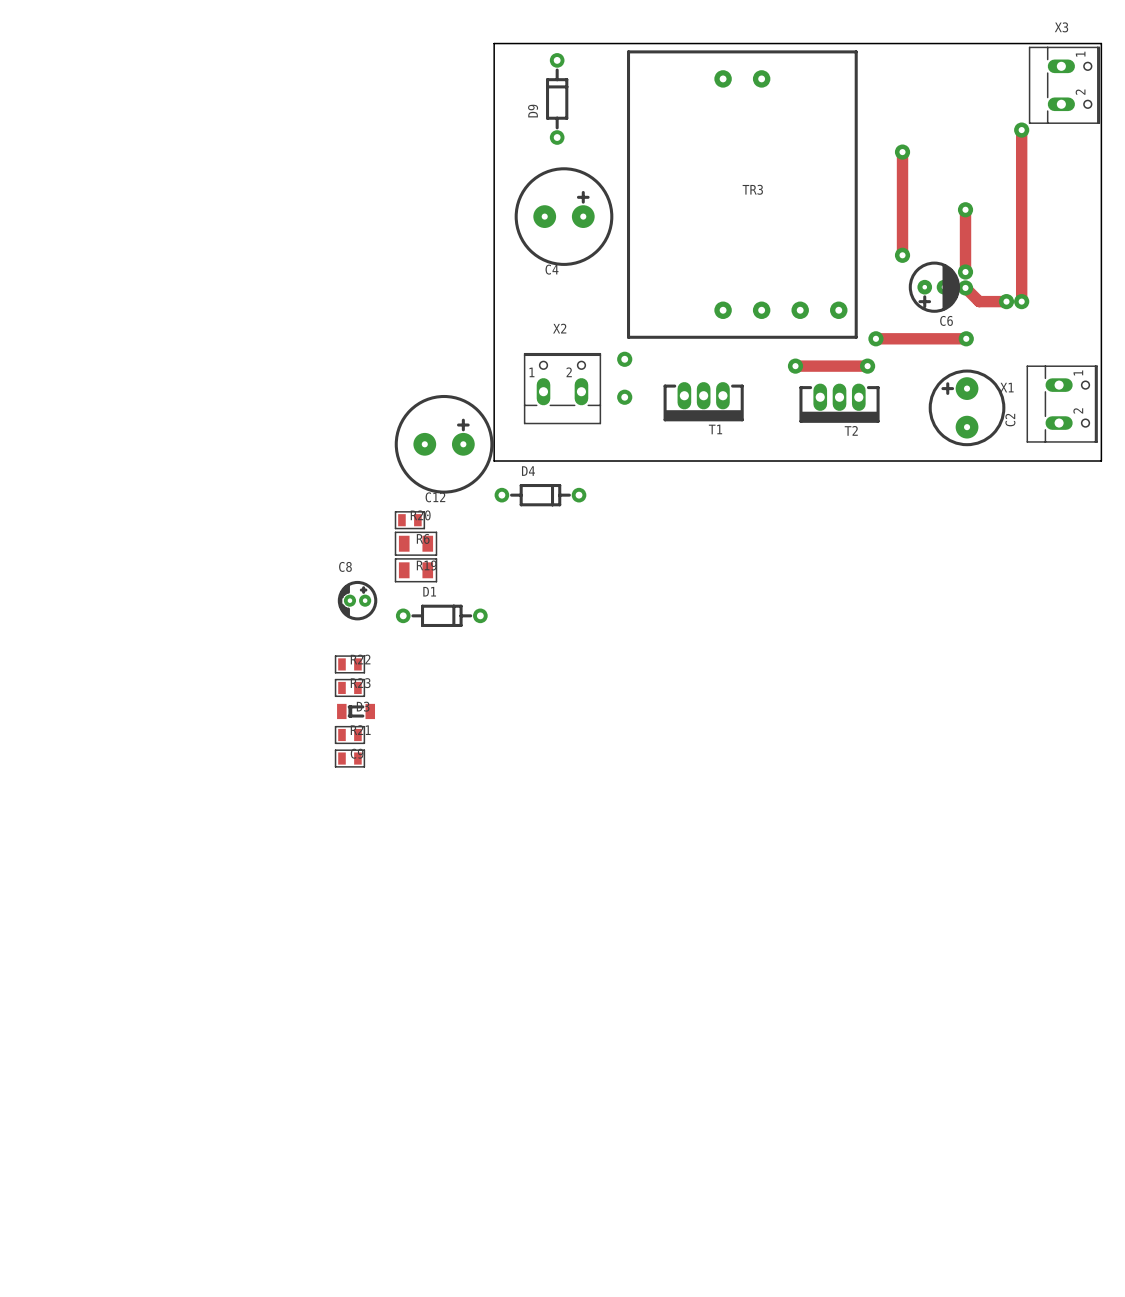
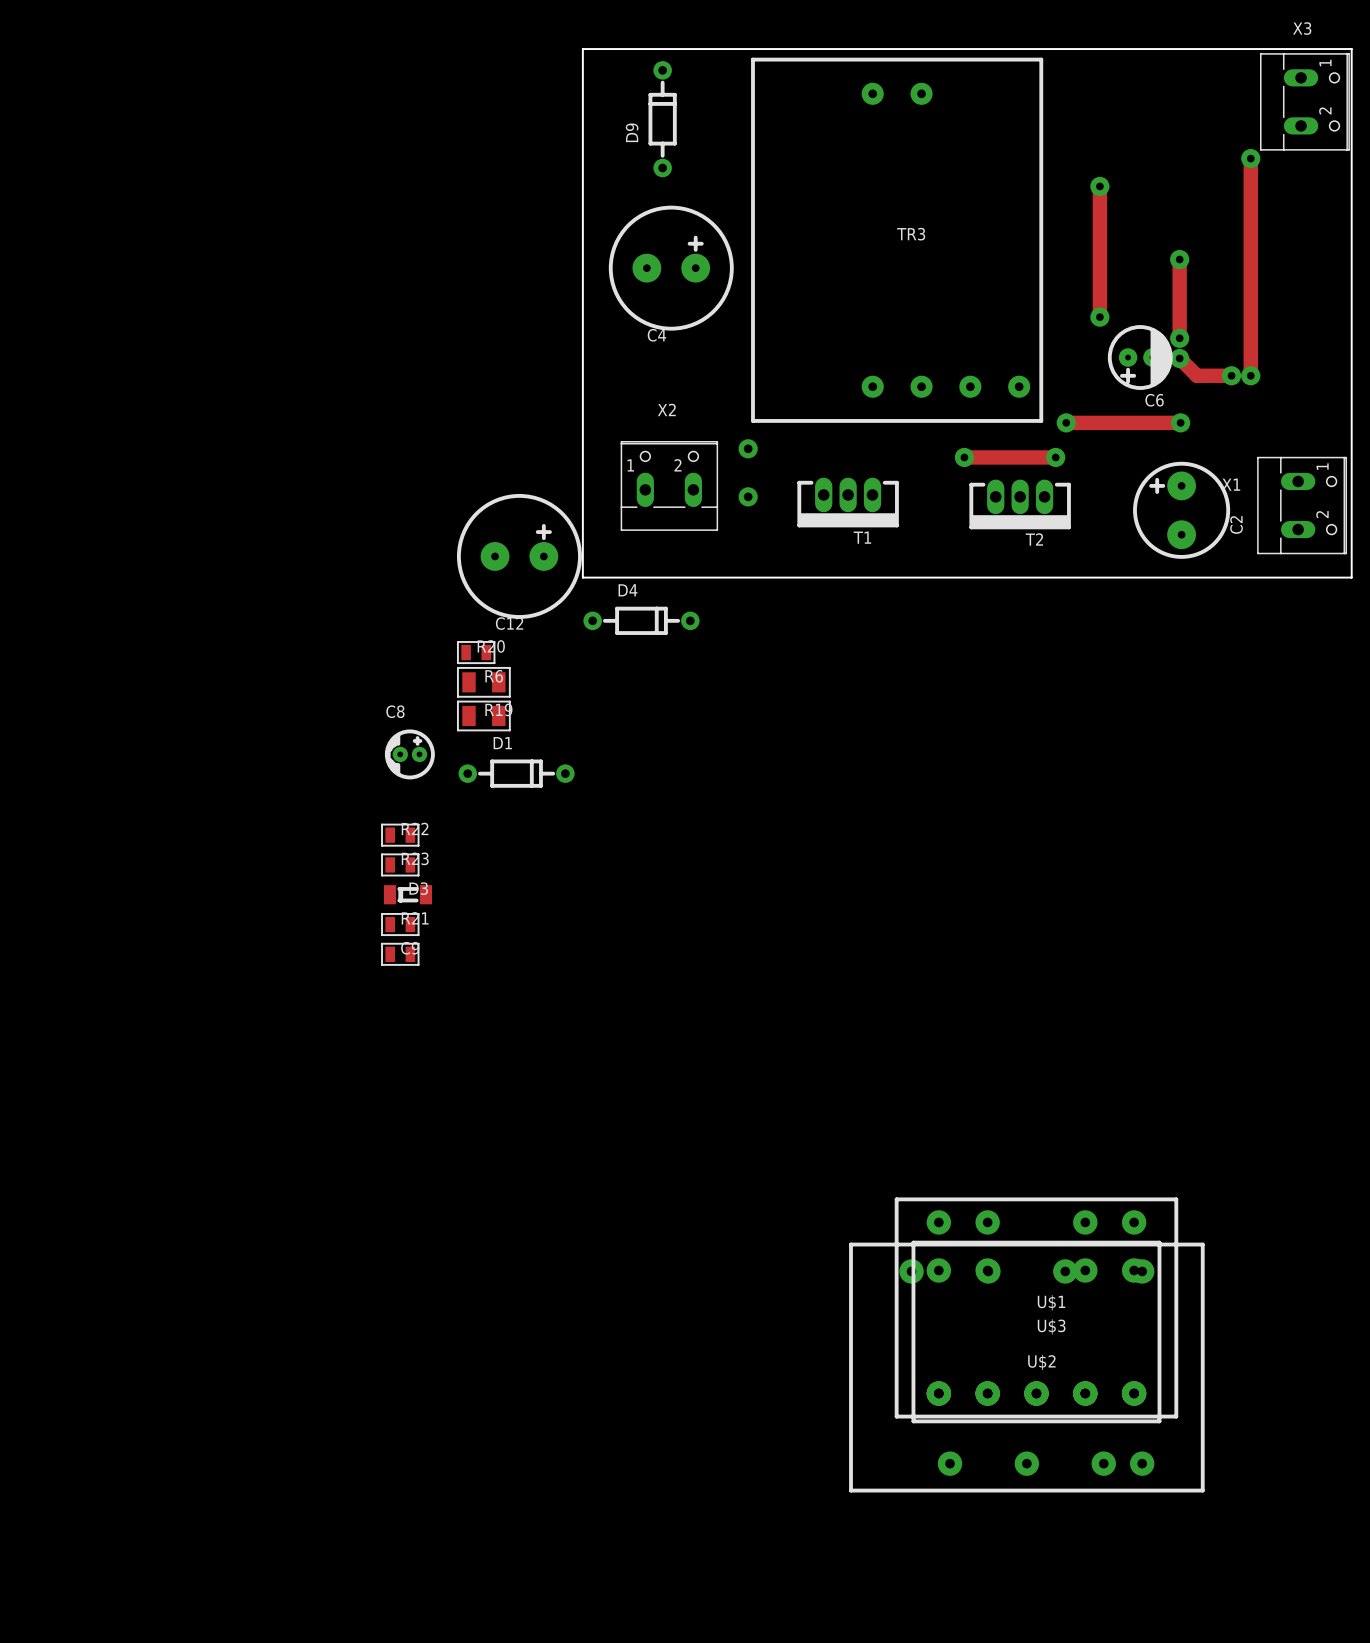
U$1: none -> (1036, 1307)
U$3: none -> (1036, 1332)
U$2: none -> (1026, 1367)

